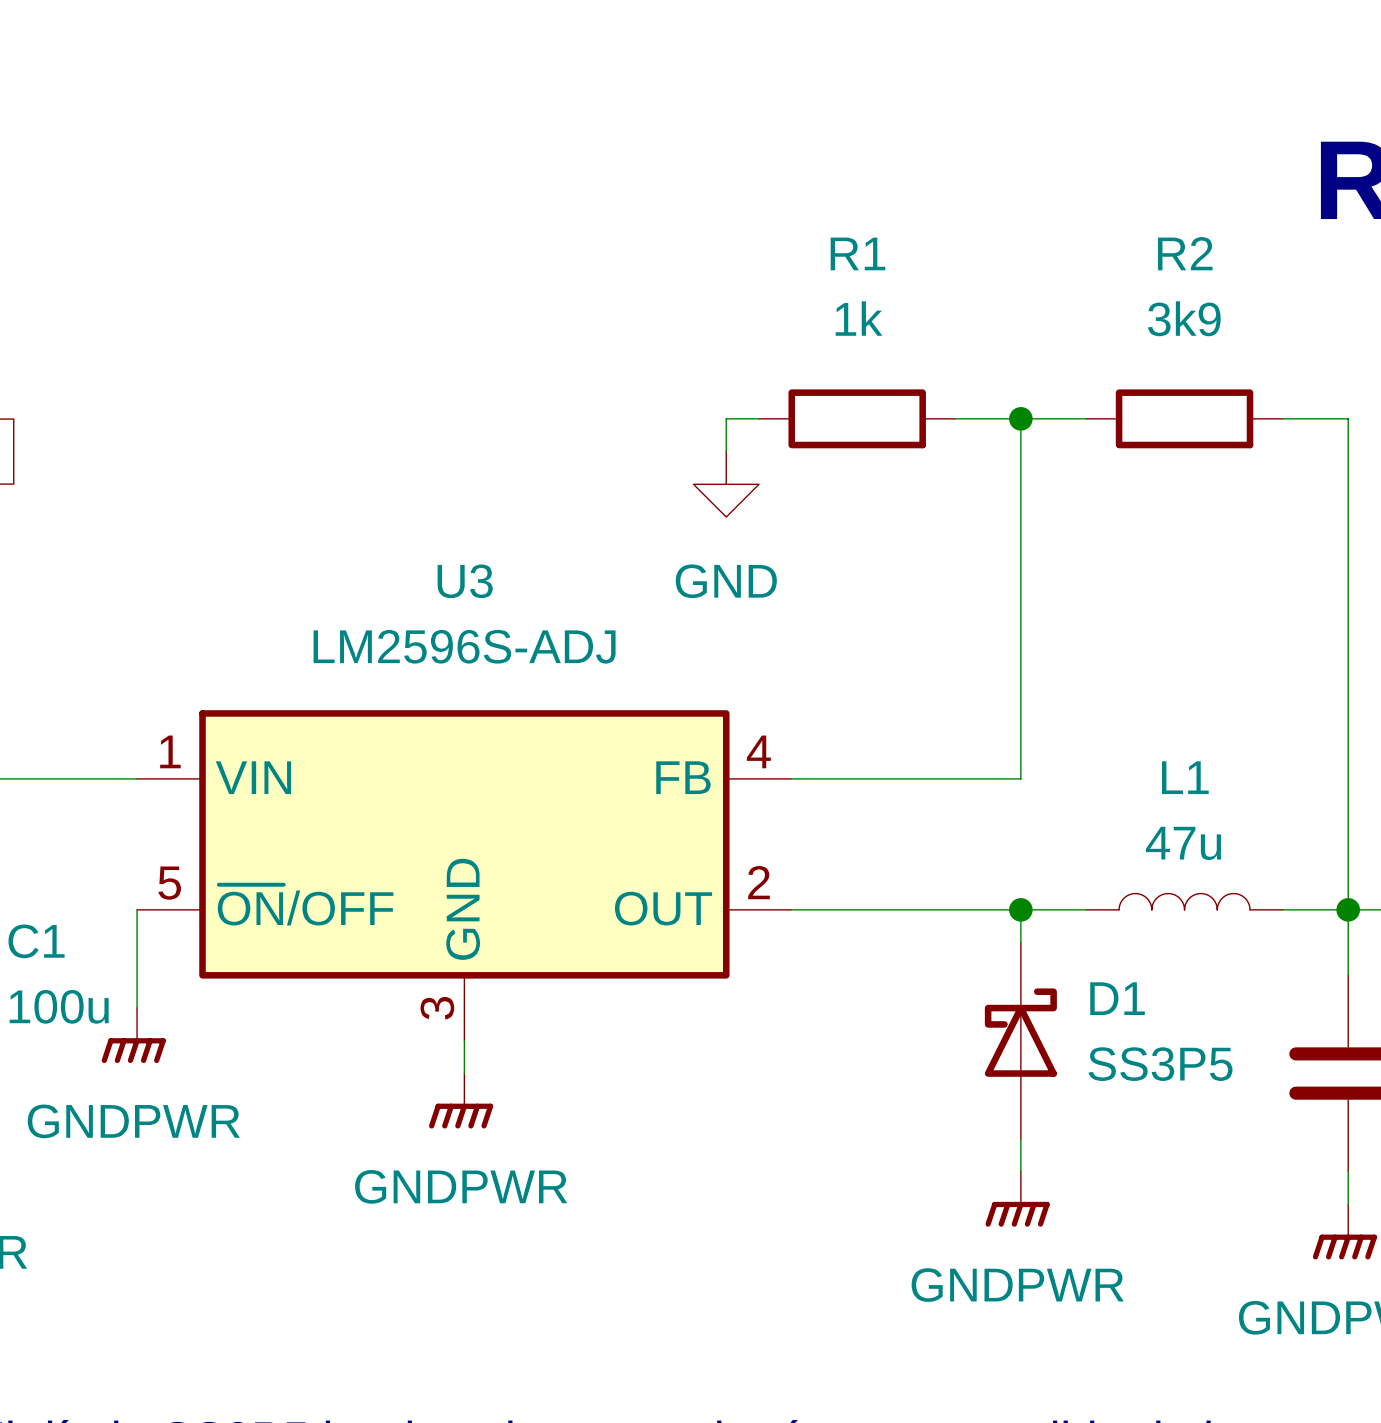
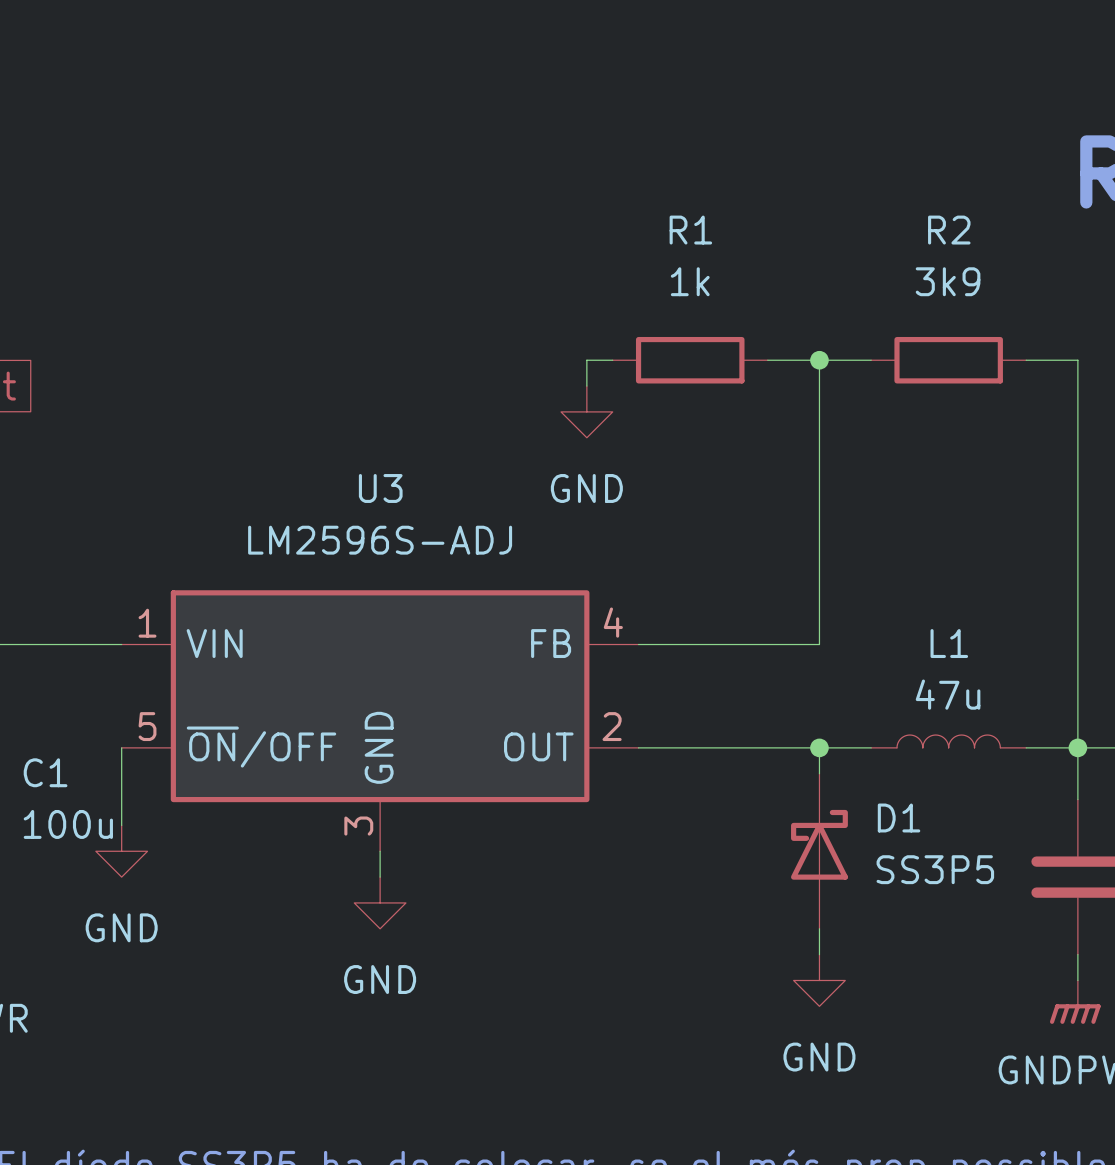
power symbol: GNDPWR (133, 1035) -> GND (121, 851)
power symbol: GNDPWR (461, 1101) -> GND (380, 902)
power symbol: GNDPWR (1017, 1199) -> GND (819, 980)

